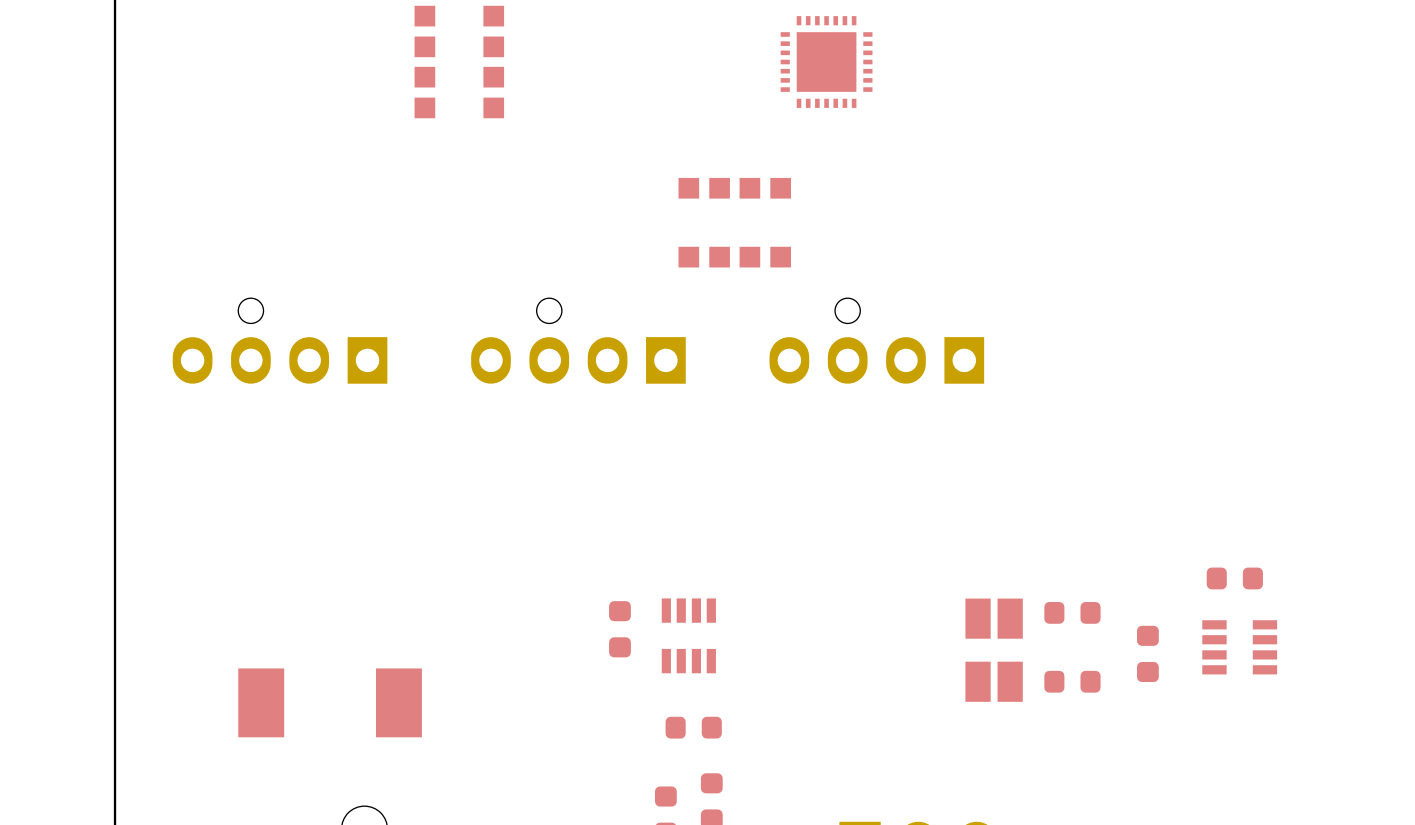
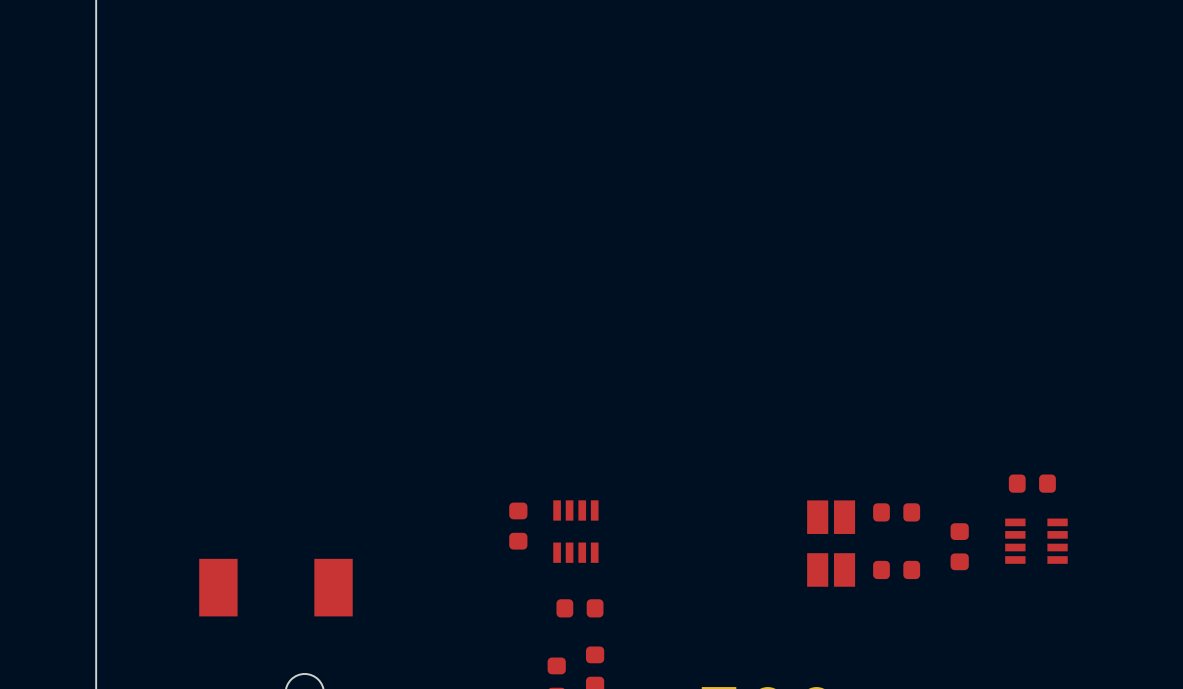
part: (459, 62) -> none
part: (826, 62) -> none
part: (734, 222) -> none
part: (280, 340) -> none
part: (578, 340) -> none
part: (876, 340) -> none

